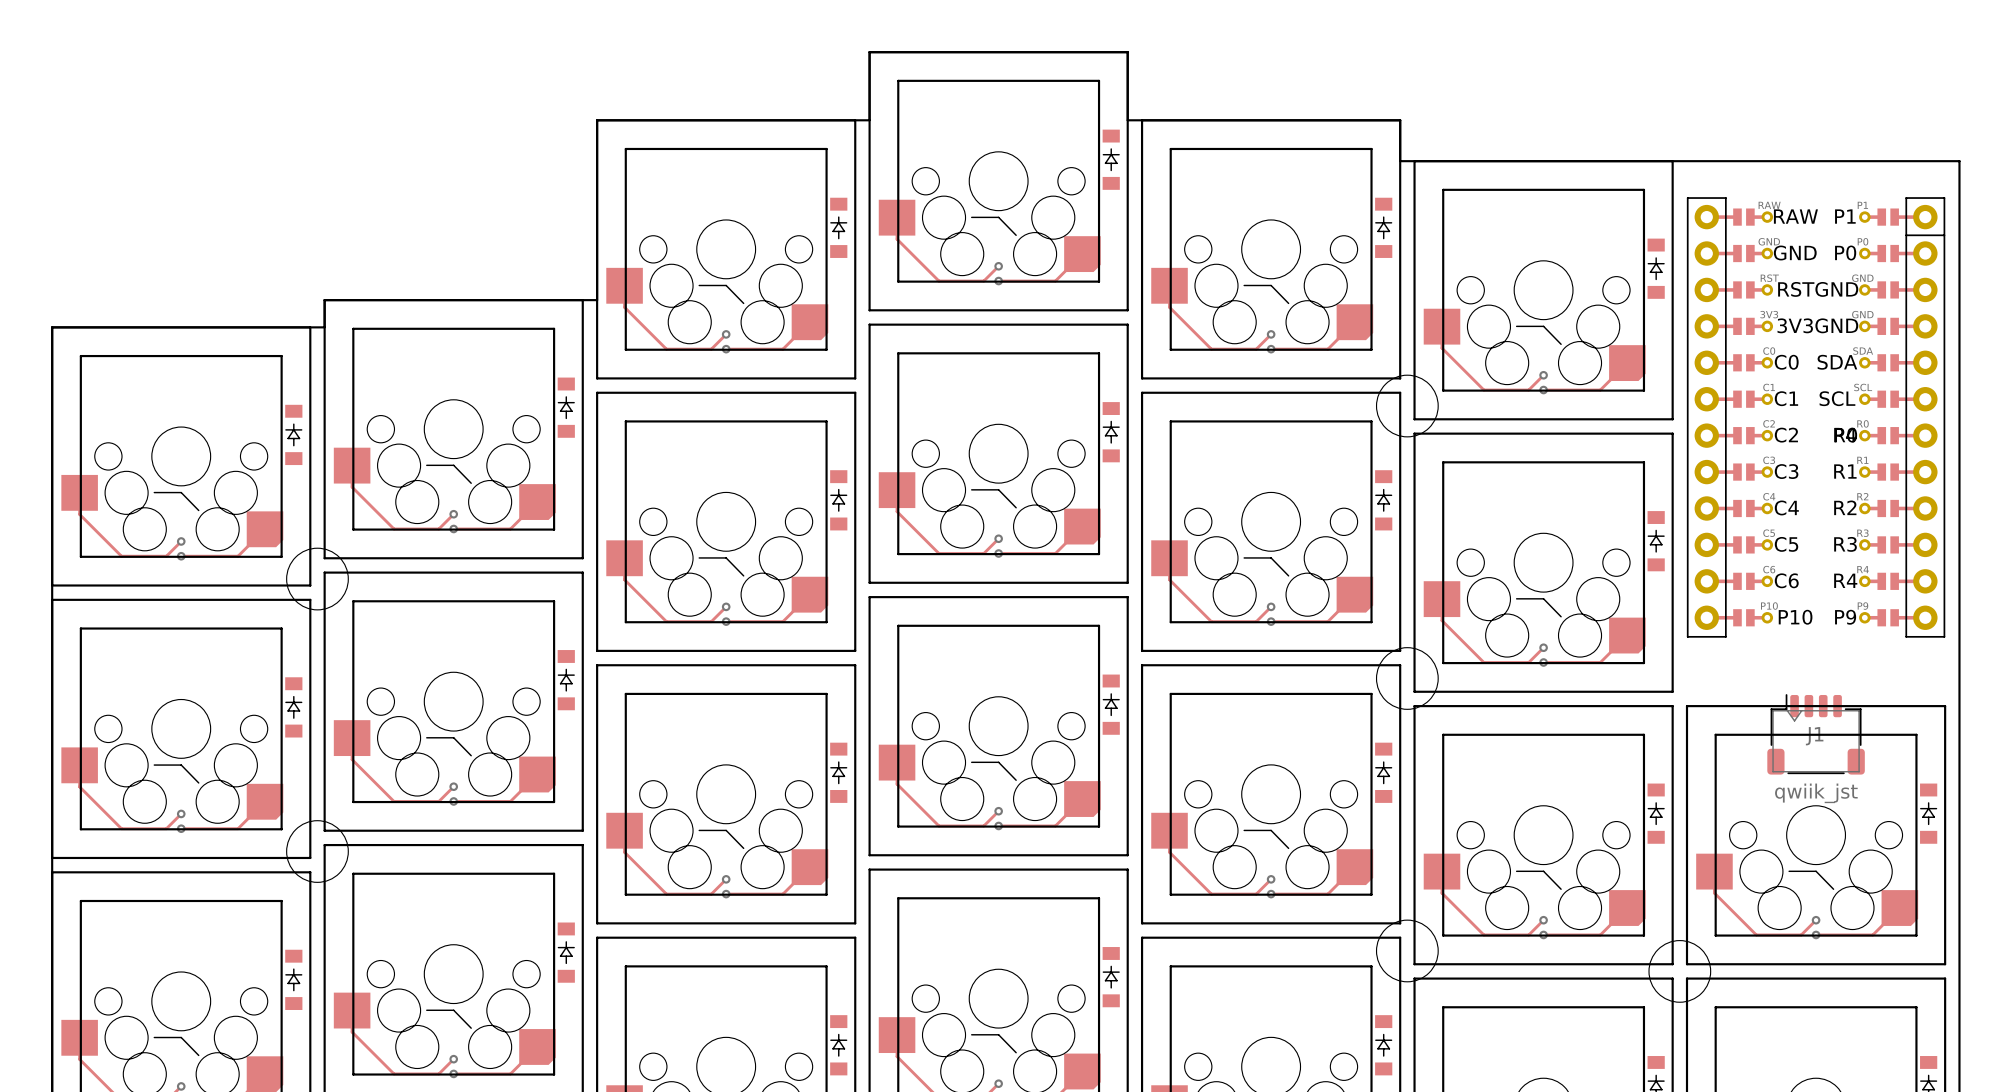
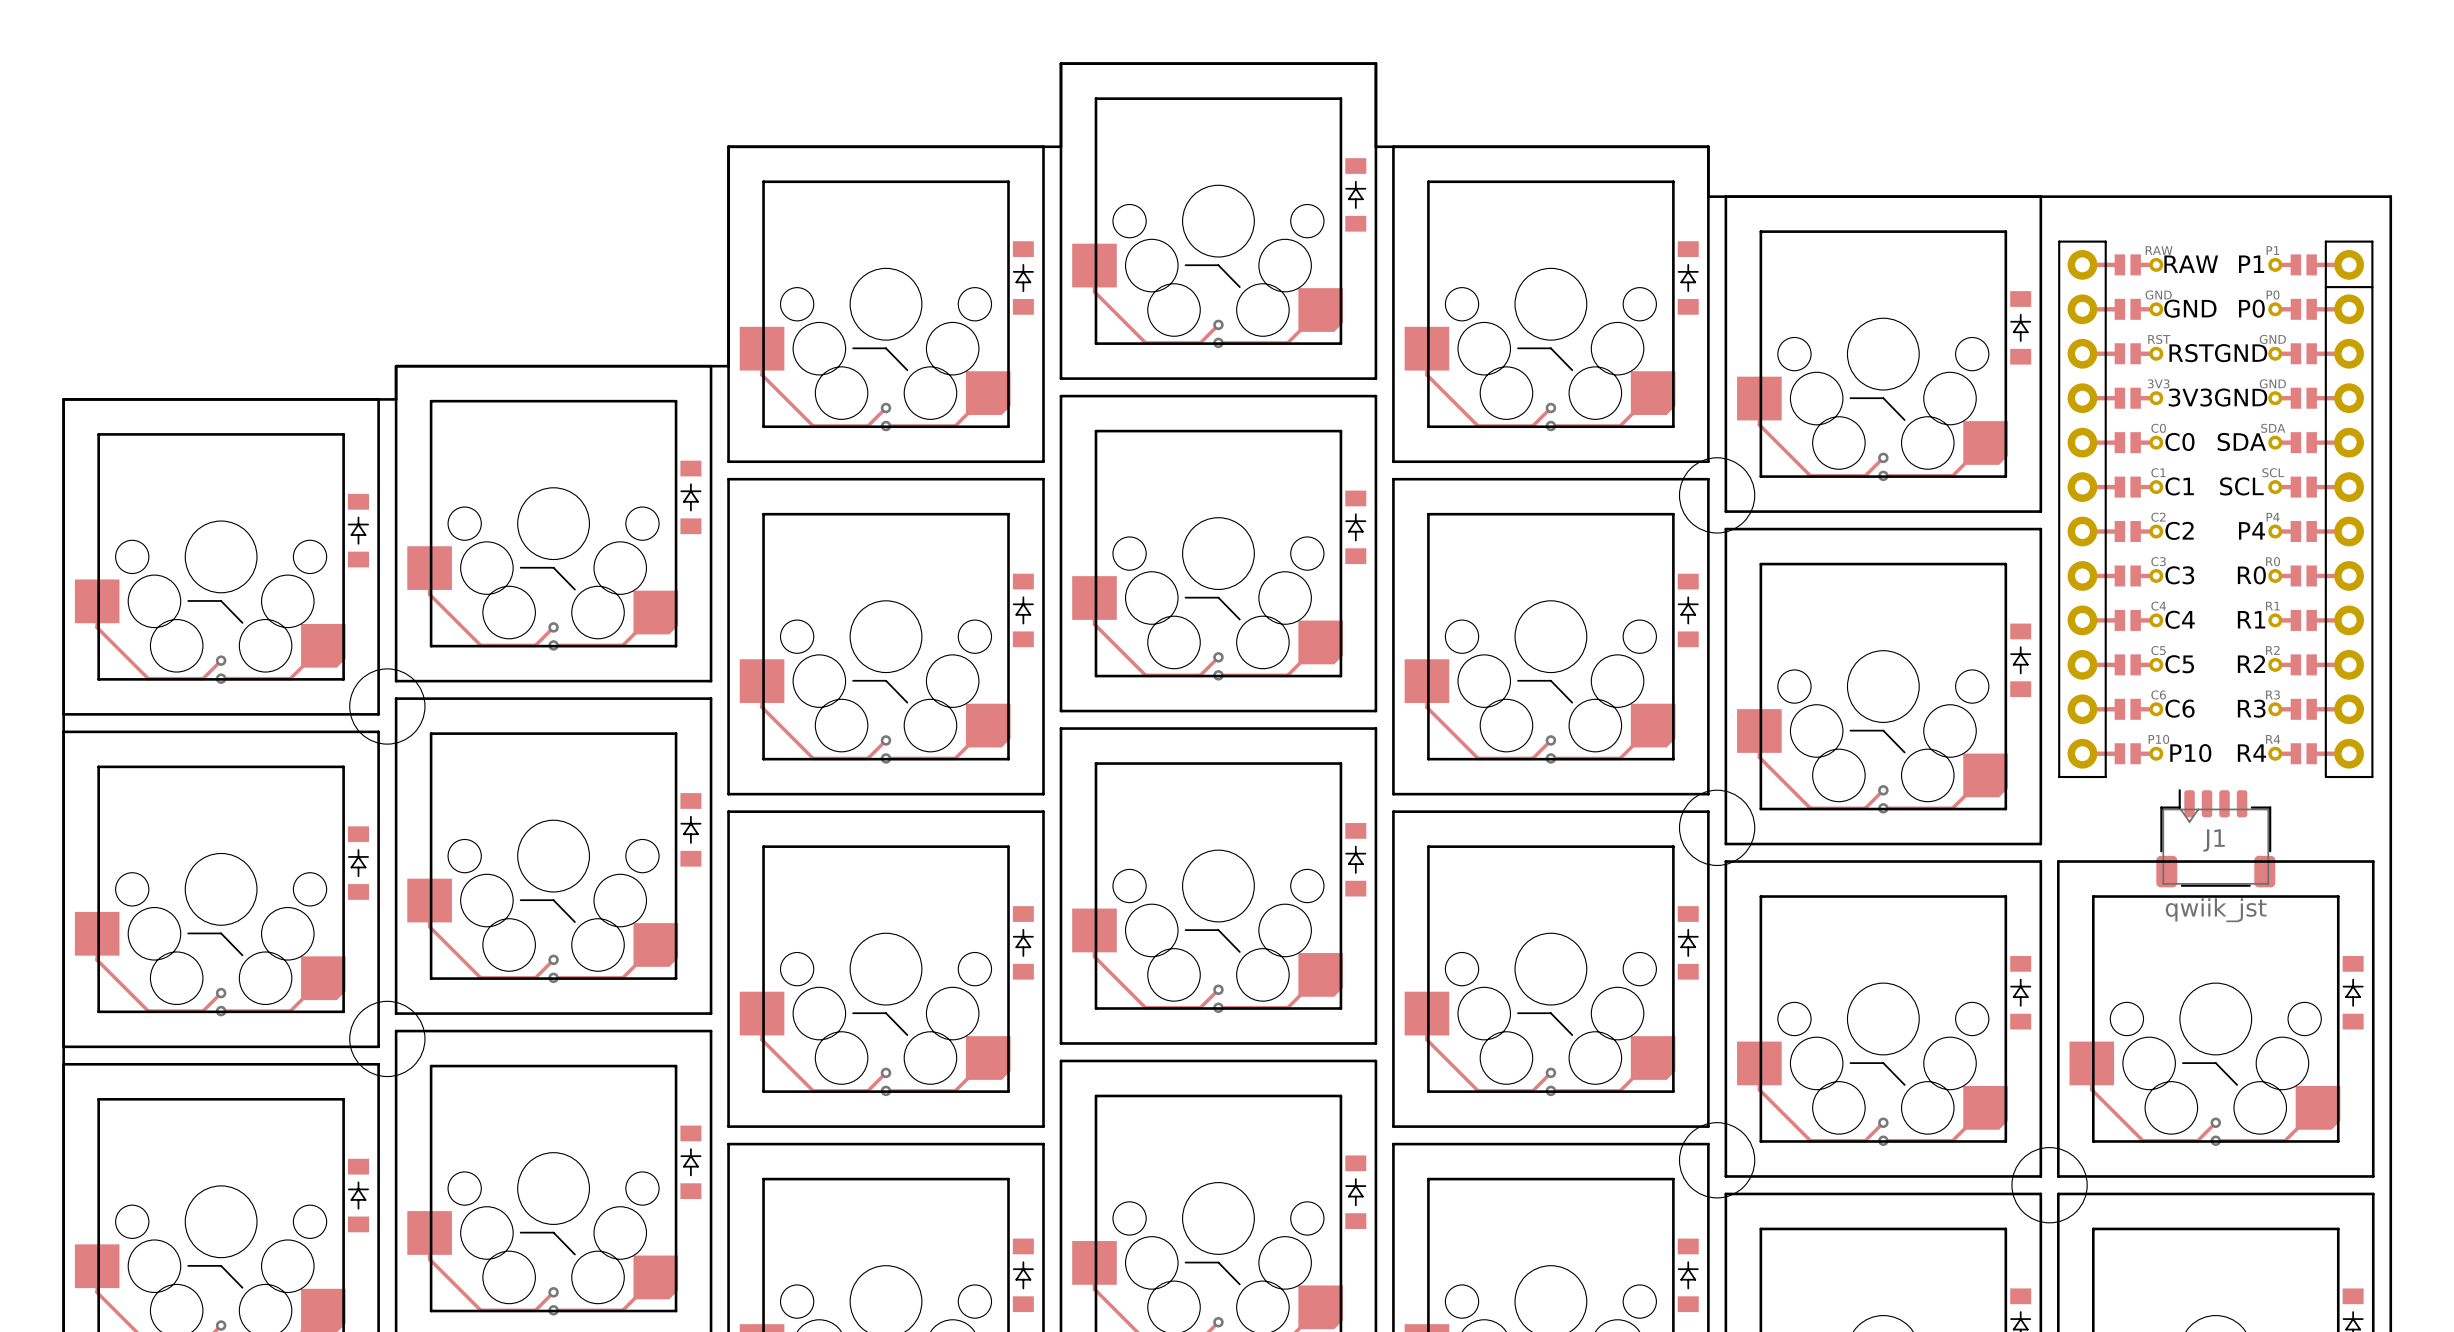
part footprint: [1686, 197, 1946, 638] -> [2058, 240, 2374, 779]
part position: (1816, 734) -> (2215, 838)

